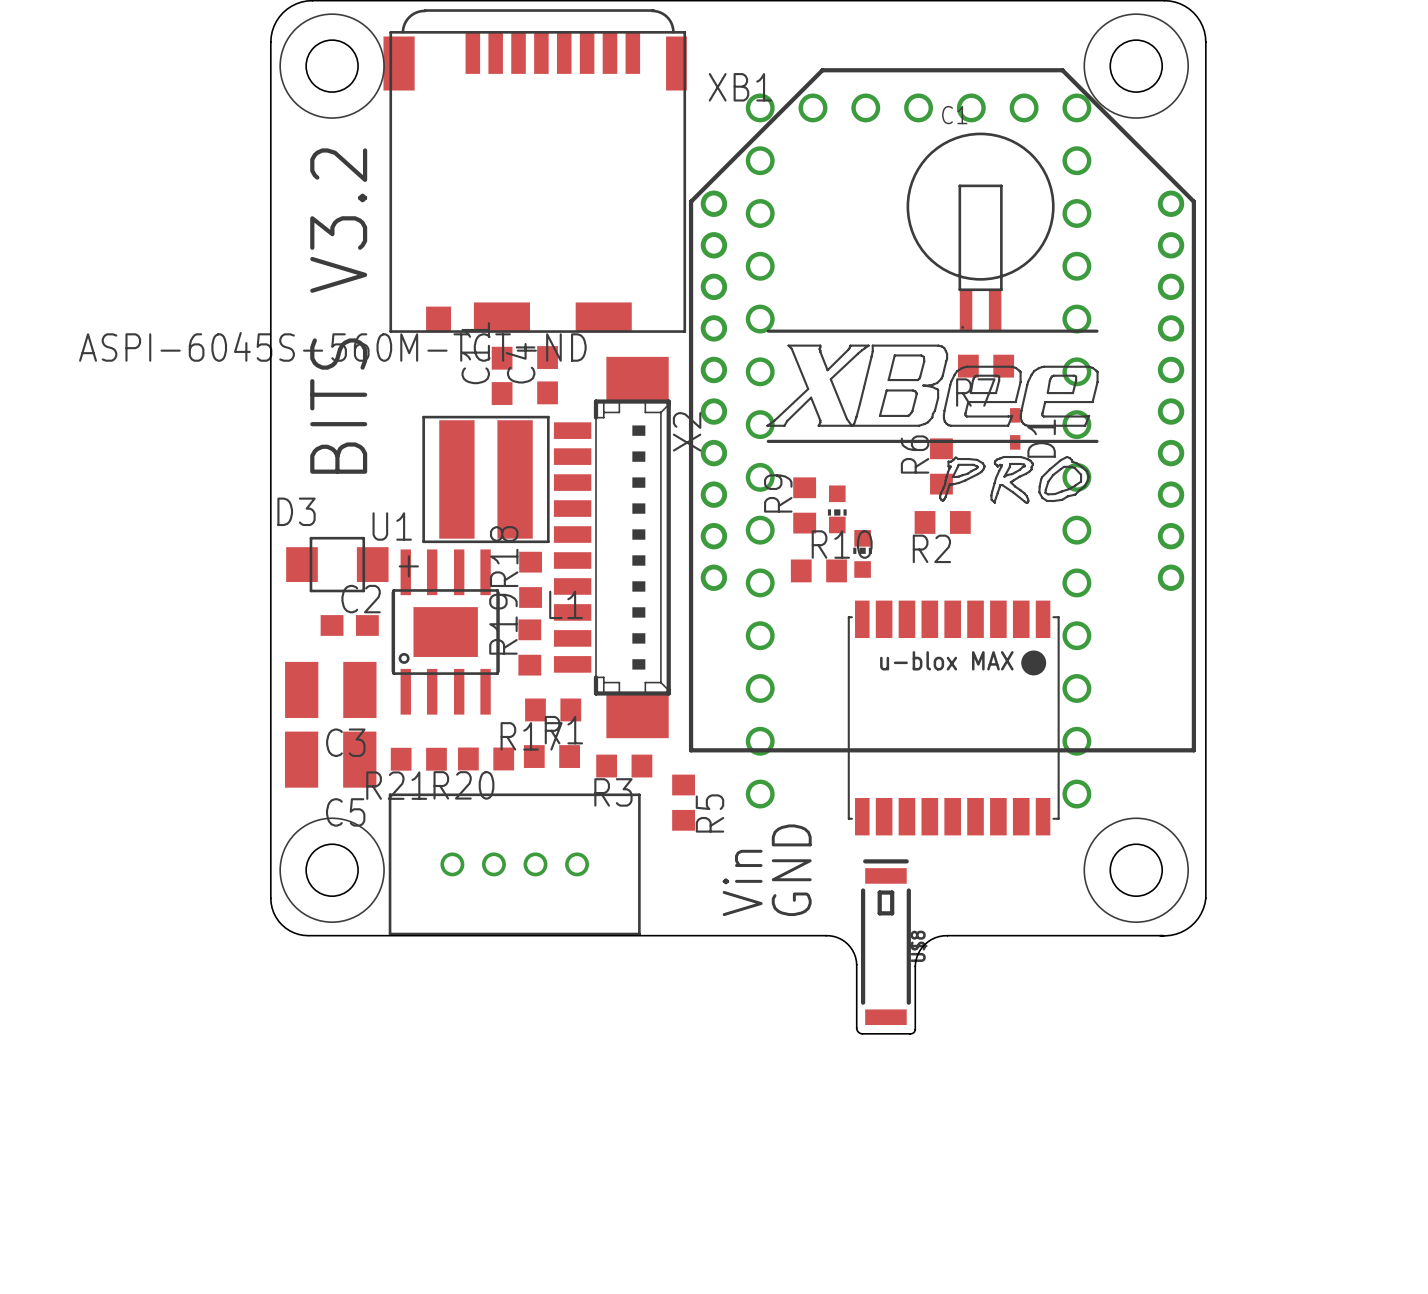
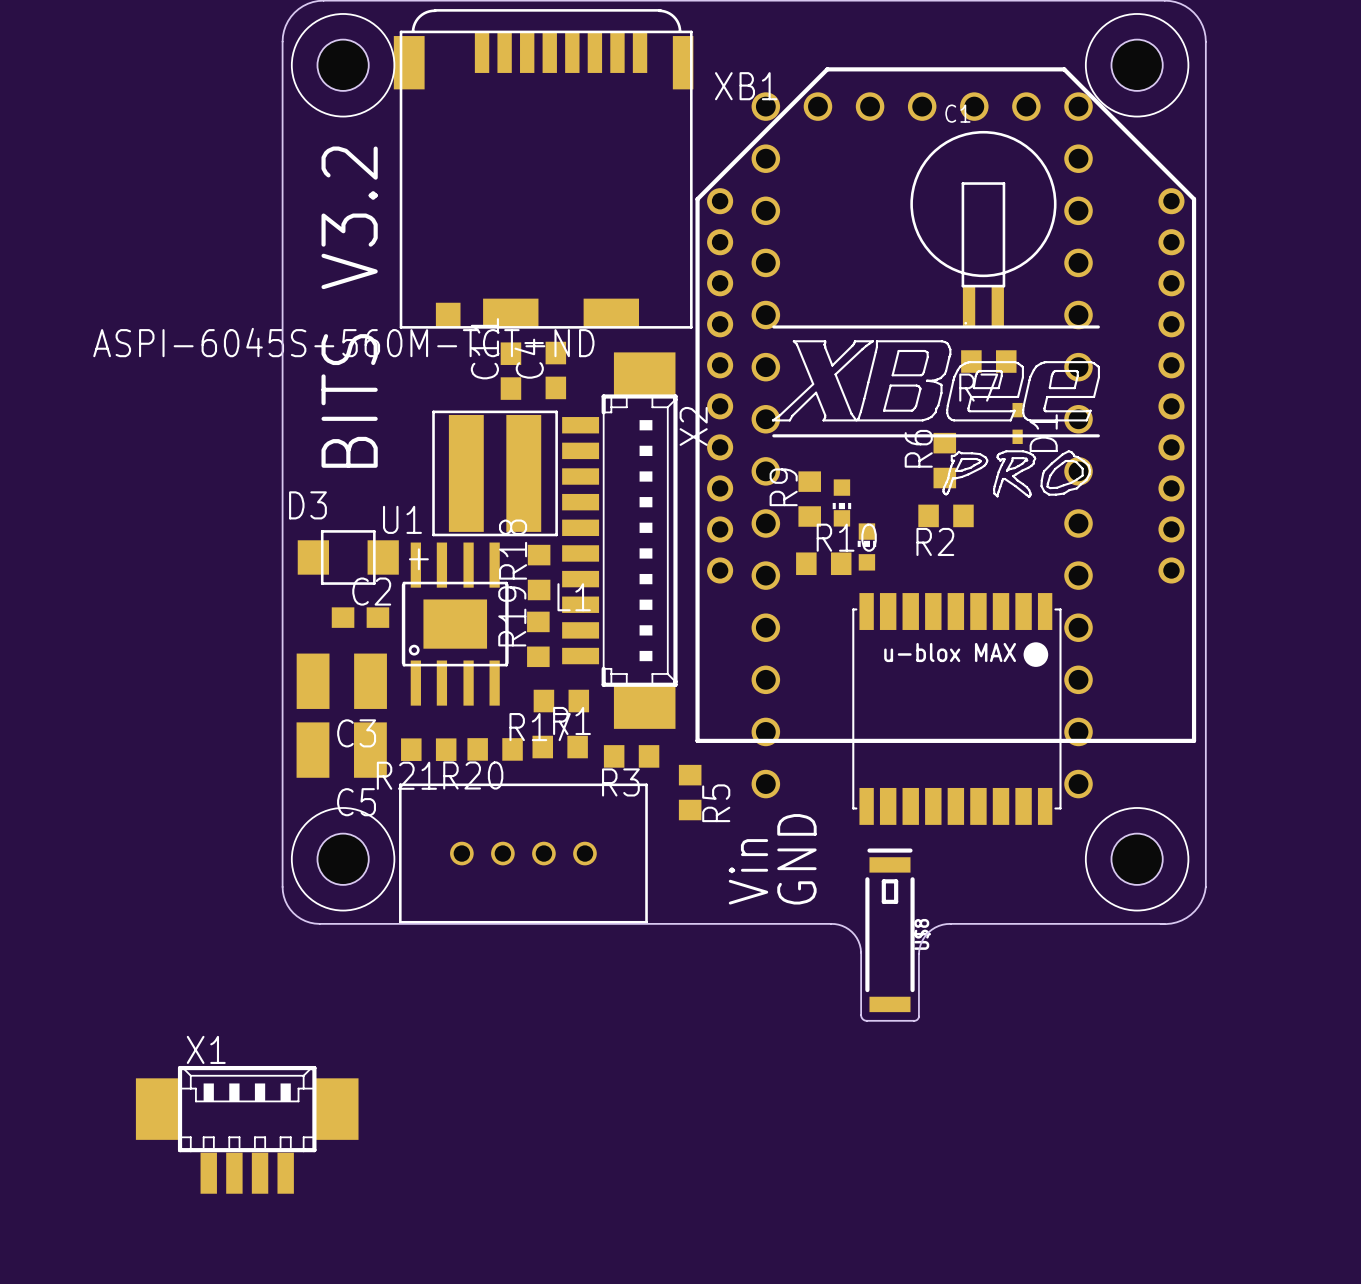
X1: none -> (247, 1129)

